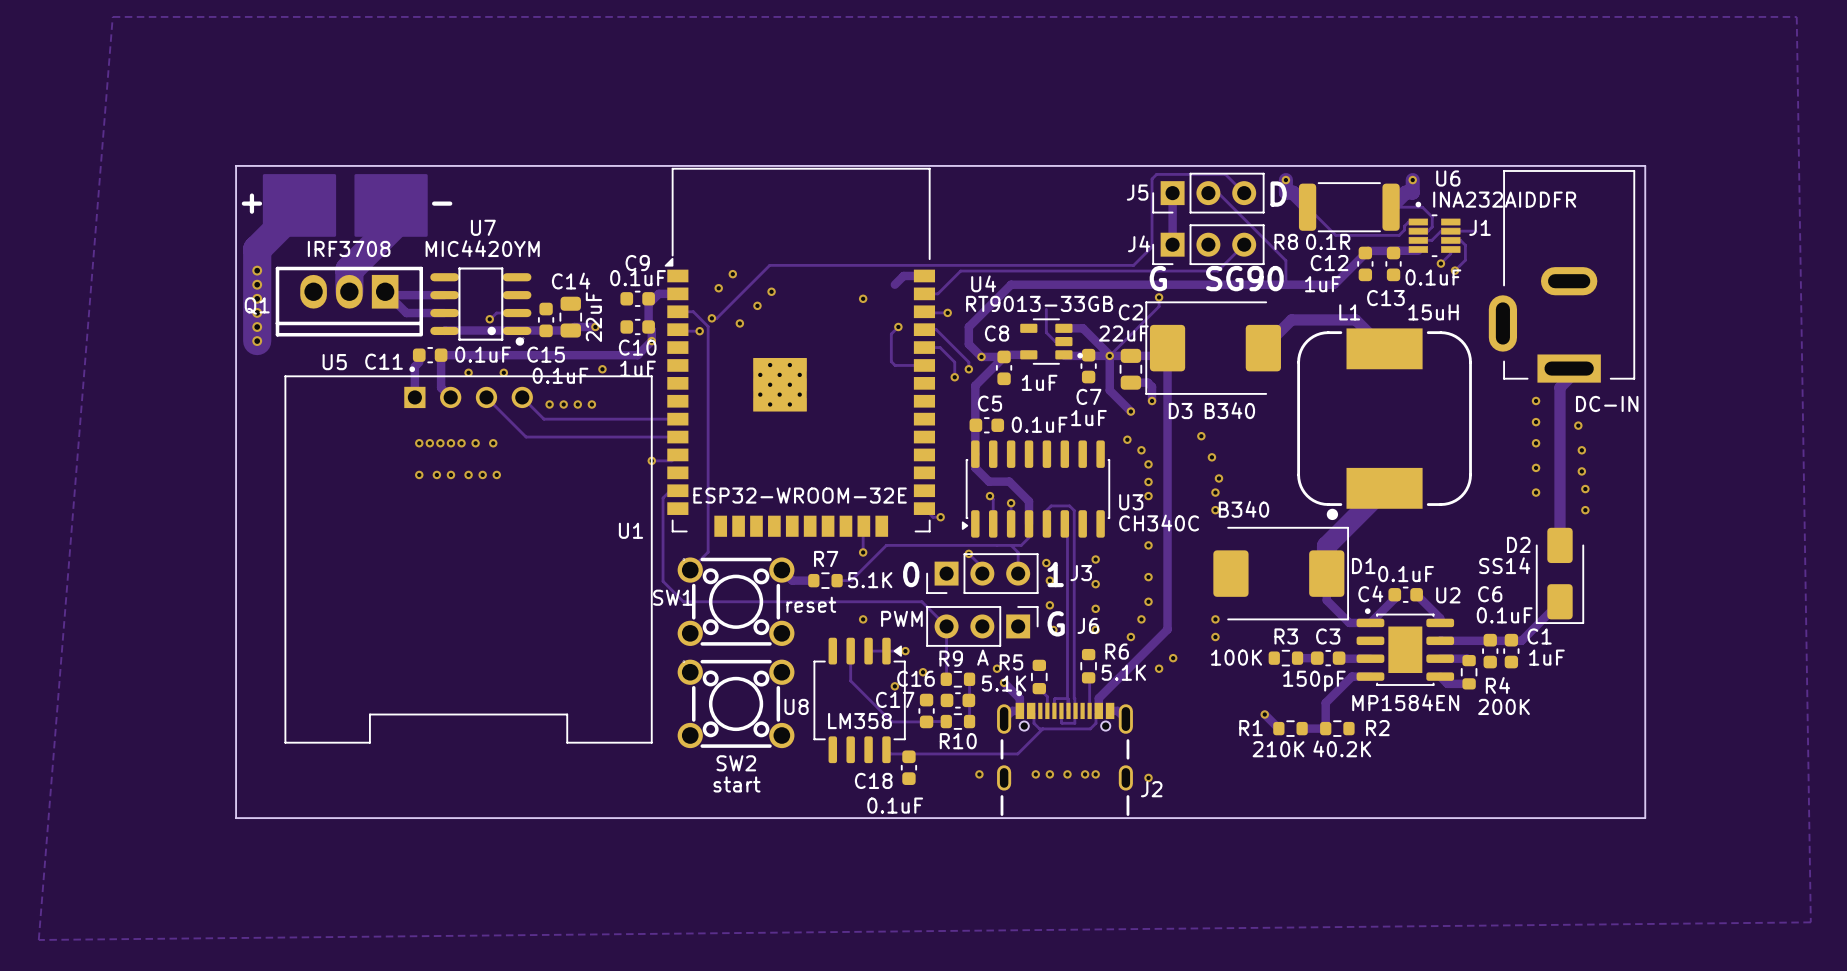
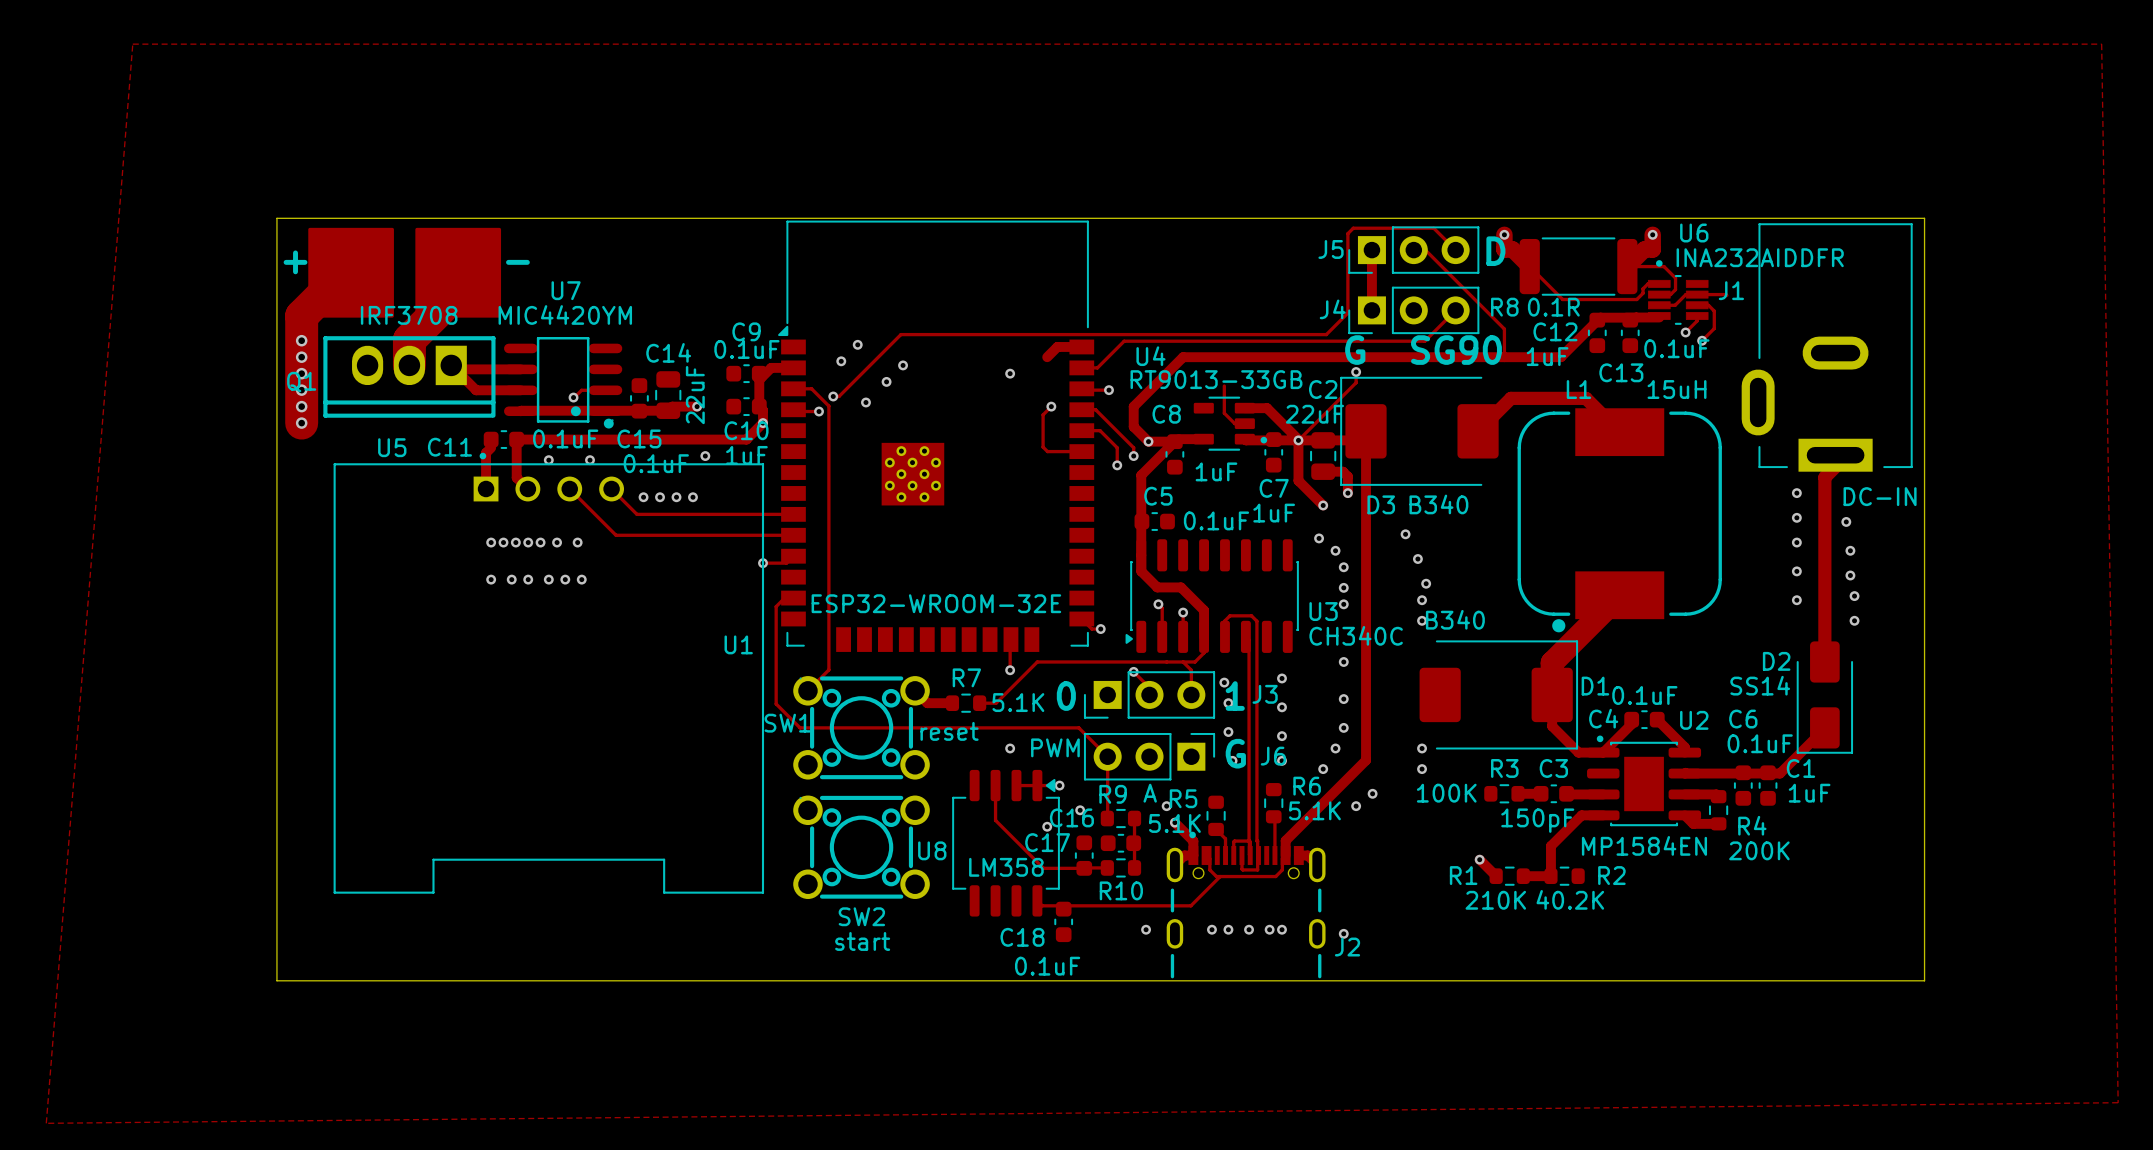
drawing shape: [262, 174, 337, 237] -> [308, 227, 394, 318]
drawing shape: [354, 174, 428, 237] -> [415, 227, 502, 318]

